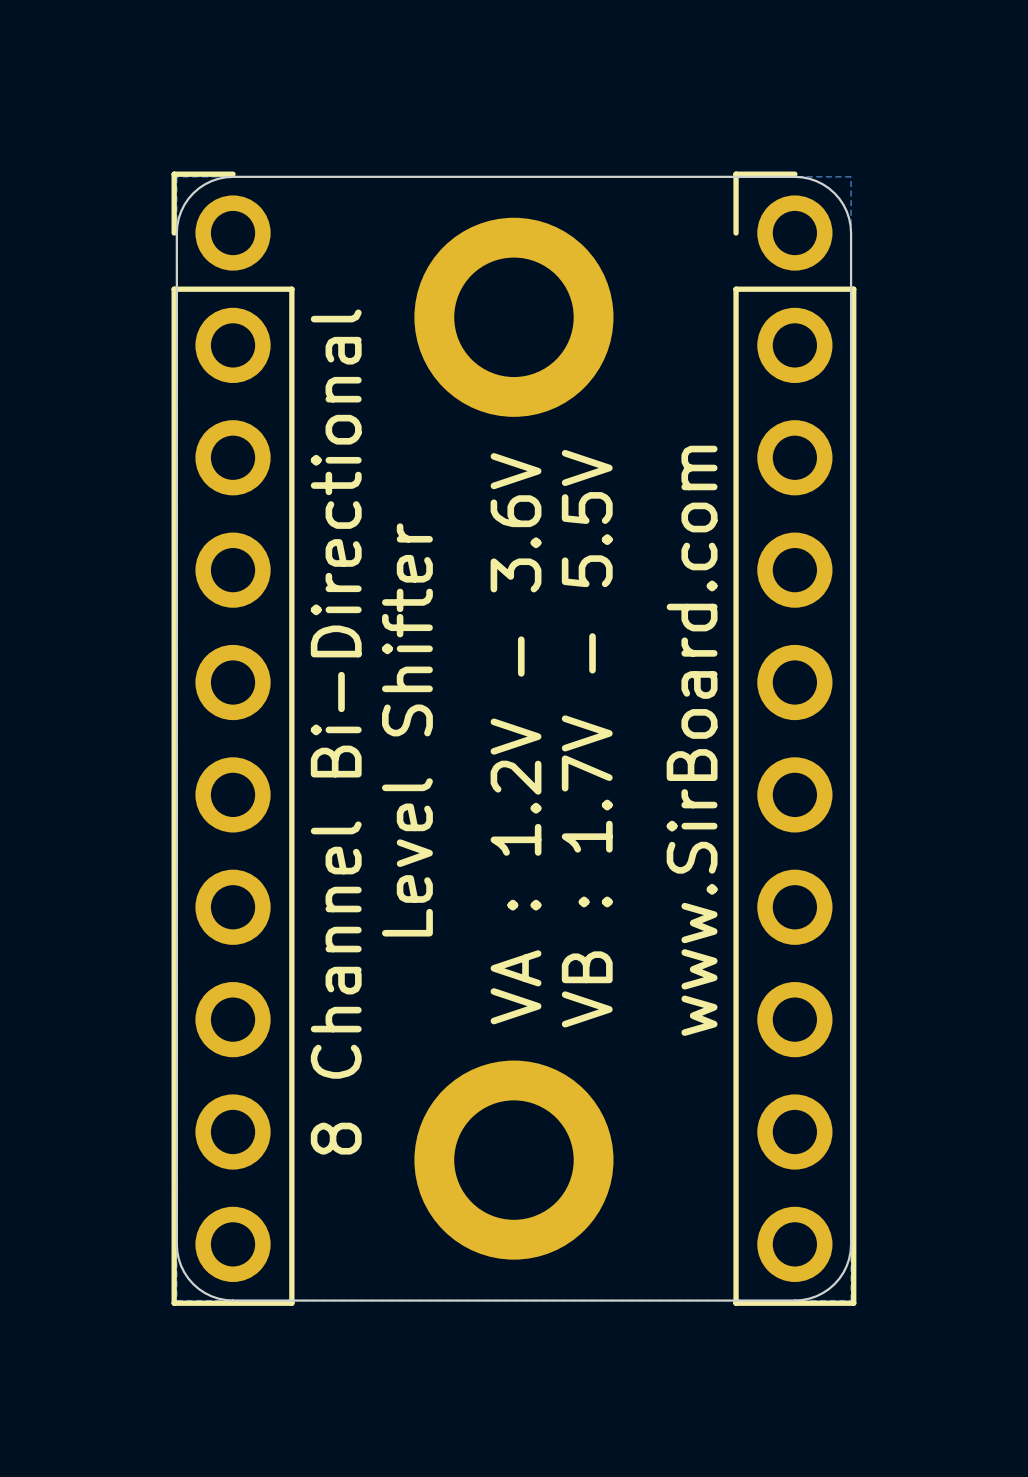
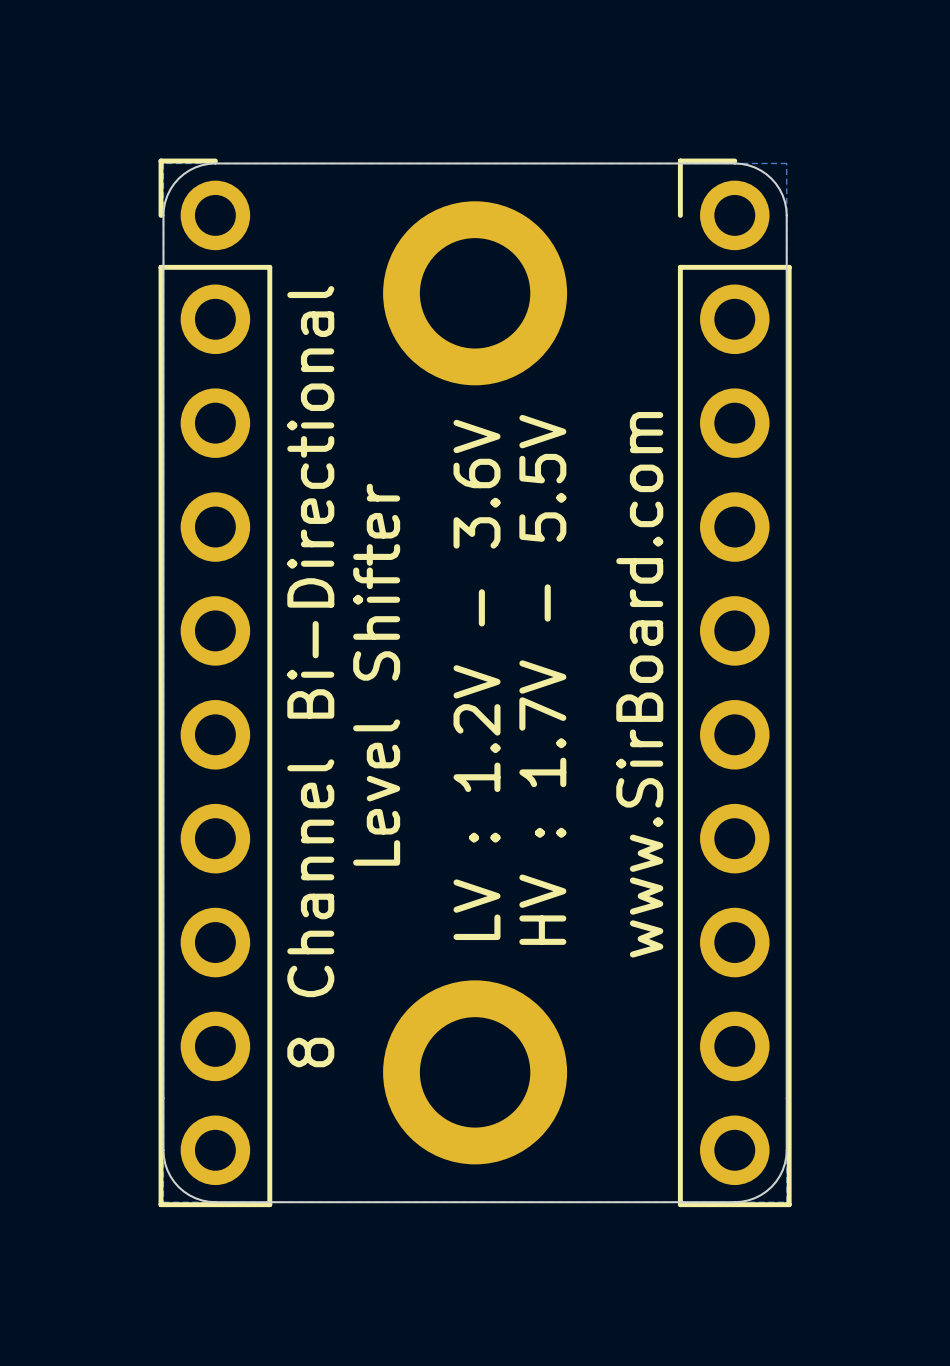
text: VA : 1.2V - 3.6V (516, 738) -> LV : 1.2V - 3.6V (477, 679)
text: VB : 1.7V - 5.5V (587, 738) -> HV : 1.7V - 5.5V (542, 679)

